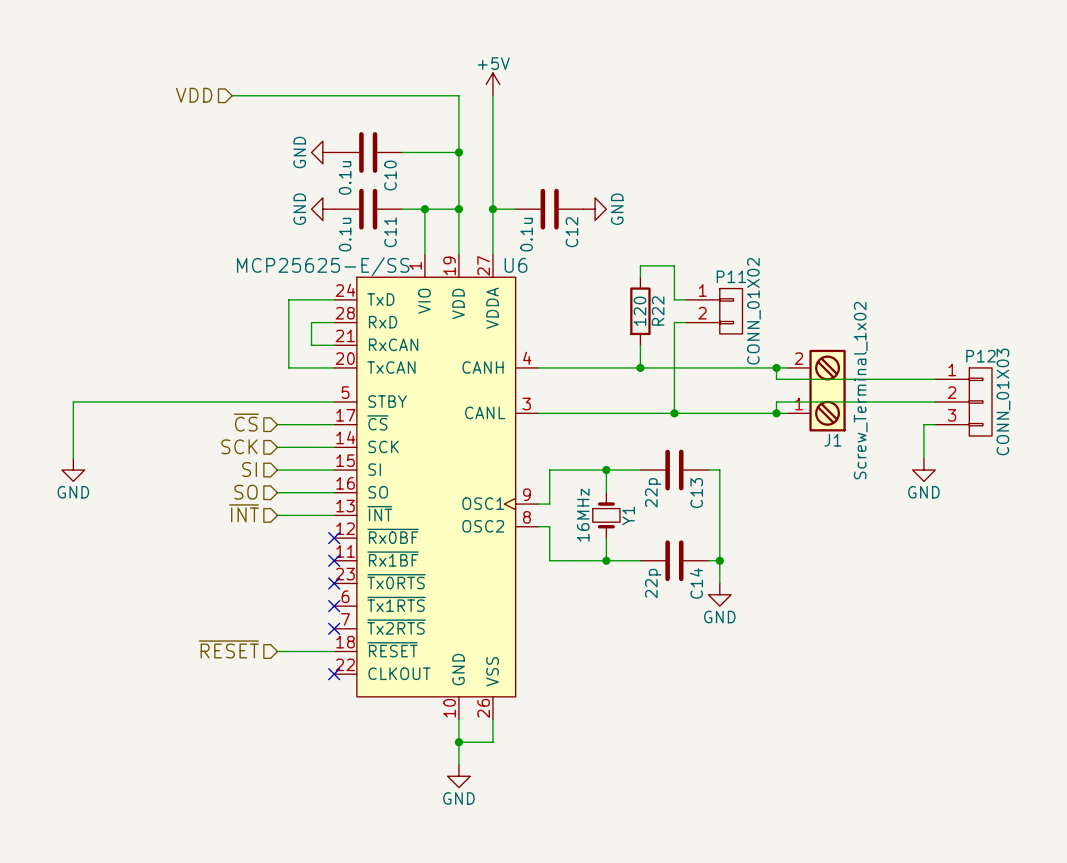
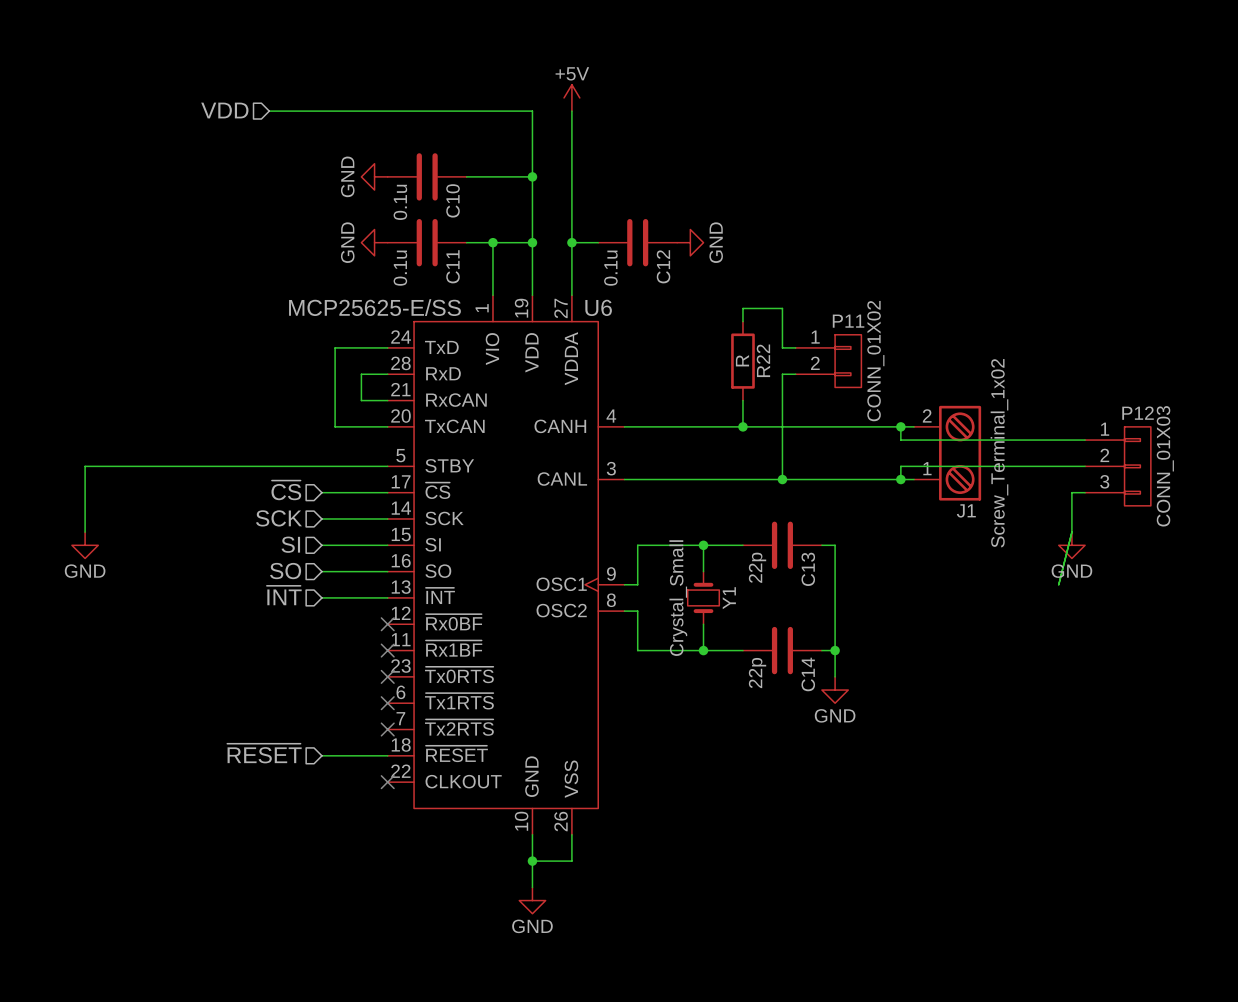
R22 value: 120 (639, 311) -> R (742, 360)
wire: none -> (1071, 532) (1058, 584)
Y1 value: 16MHz (583, 515) -> Crystal_Small (678, 598)

